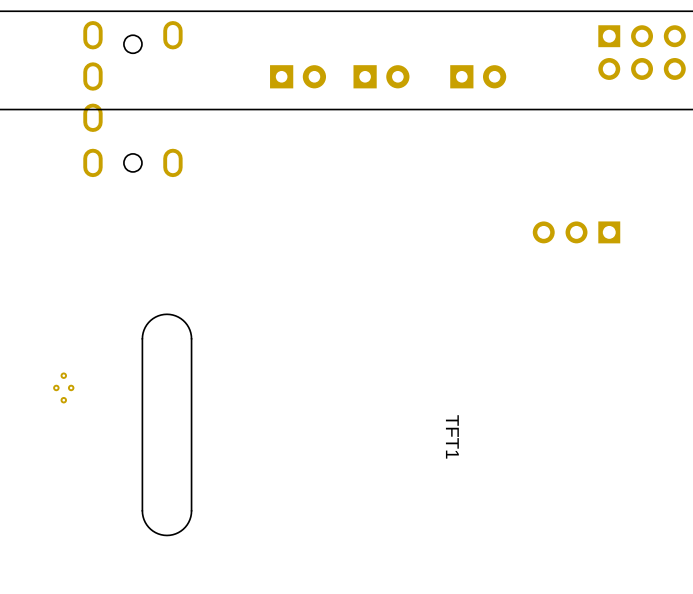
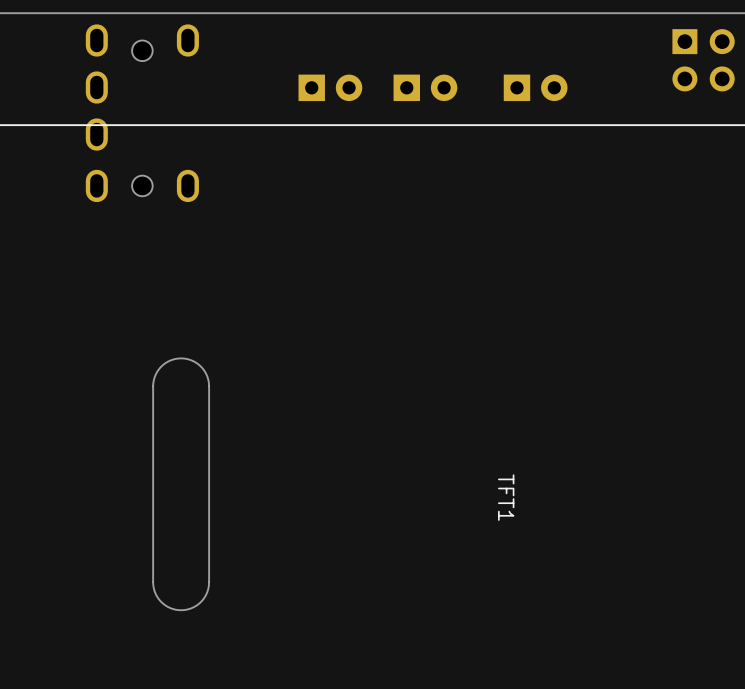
part: (576, 232) -> none
part: (63, 387) -> none

